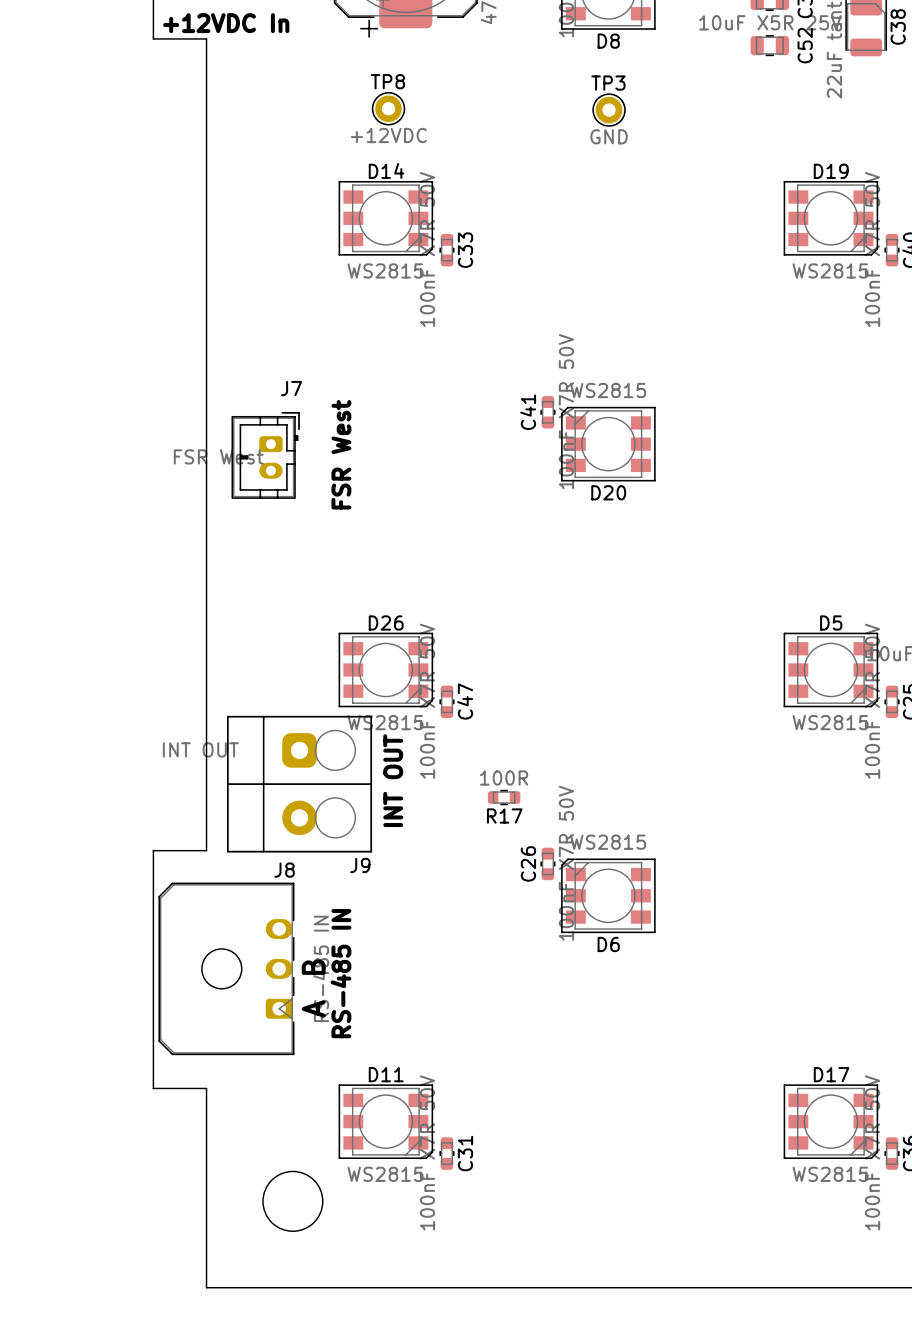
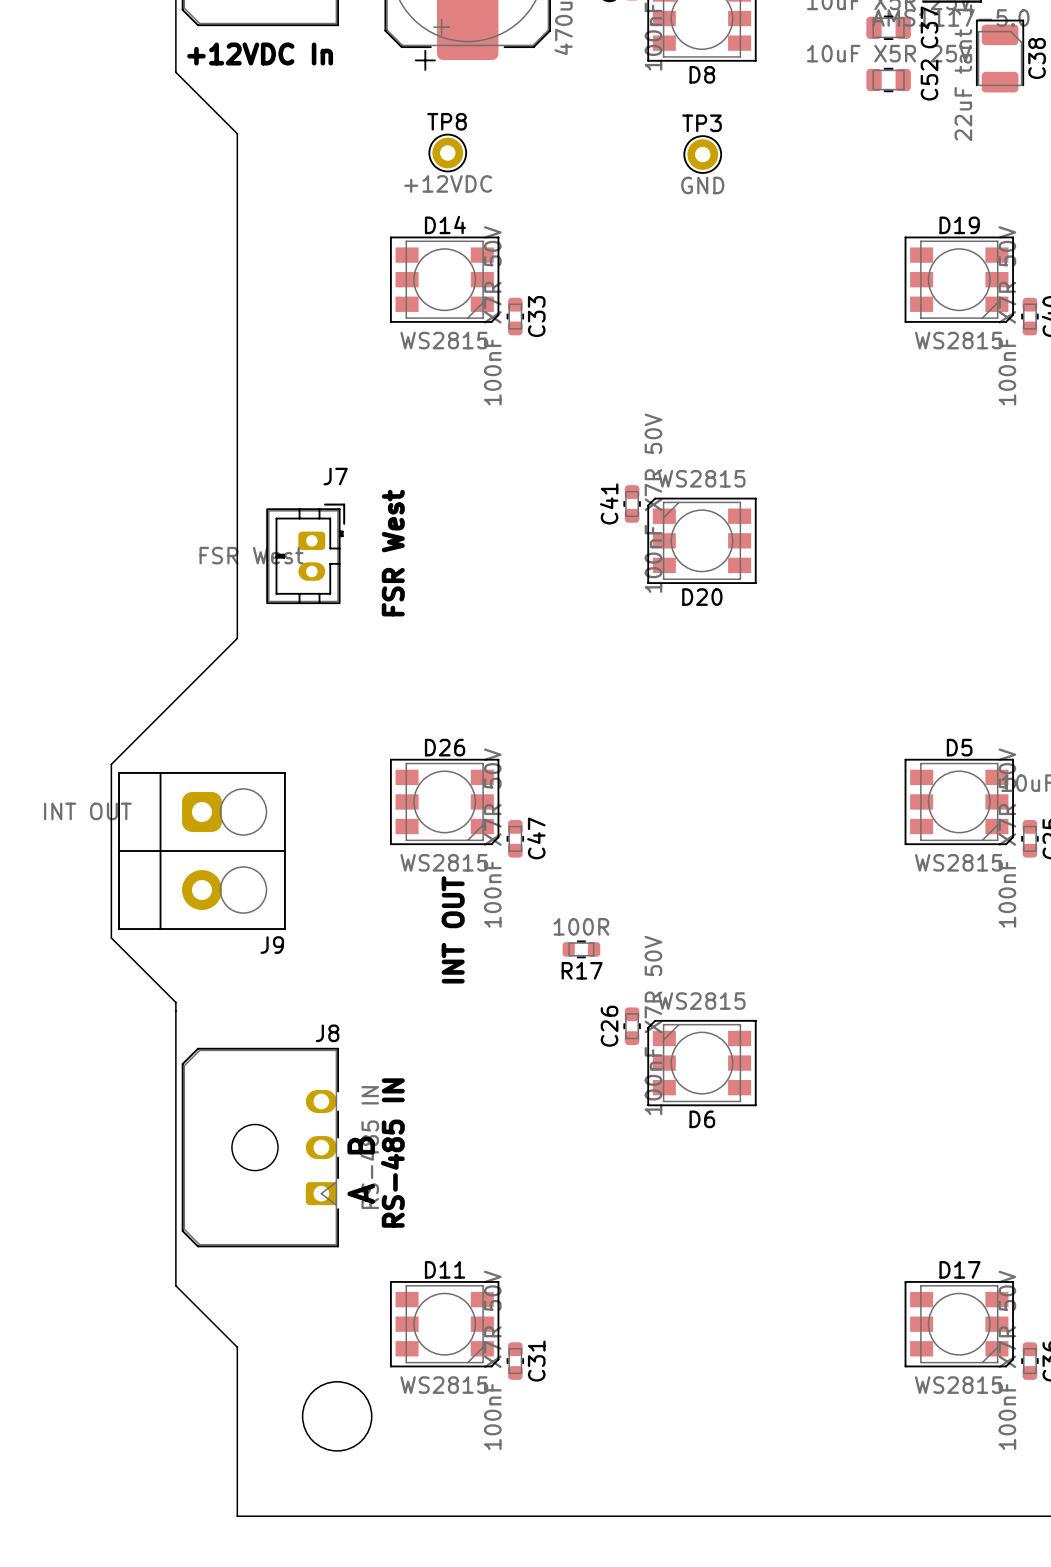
board edge: (153, 38) (206, 38) (206, 92) -> (175, 72) (237, 133)
board edge: (206, 528) (206, 850) (153, 850) -> (237, 638) (111, 764) (111, 937) (175, 1002) (175, 1010)
J9 position: (299, 784) -> (201, 851)
board edge: (153, 1088) (206, 1088) (206, 1141) -> (175, 1285) (237, 1347)

